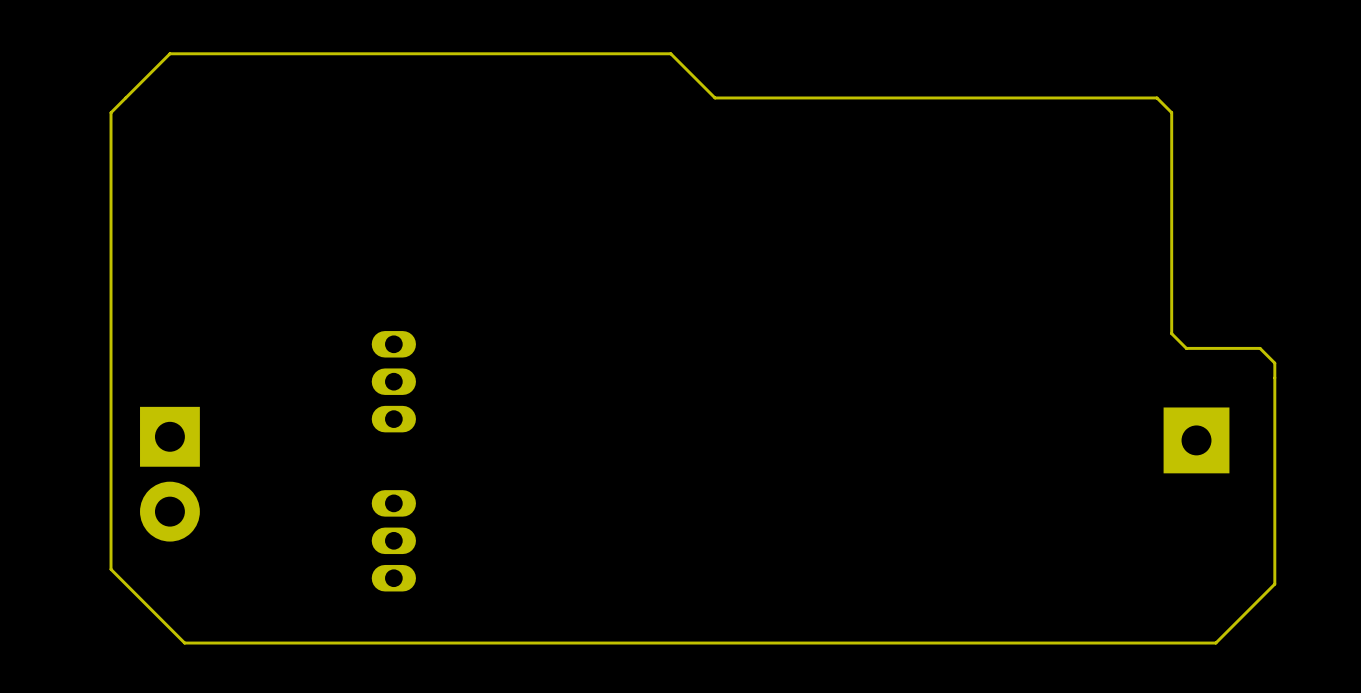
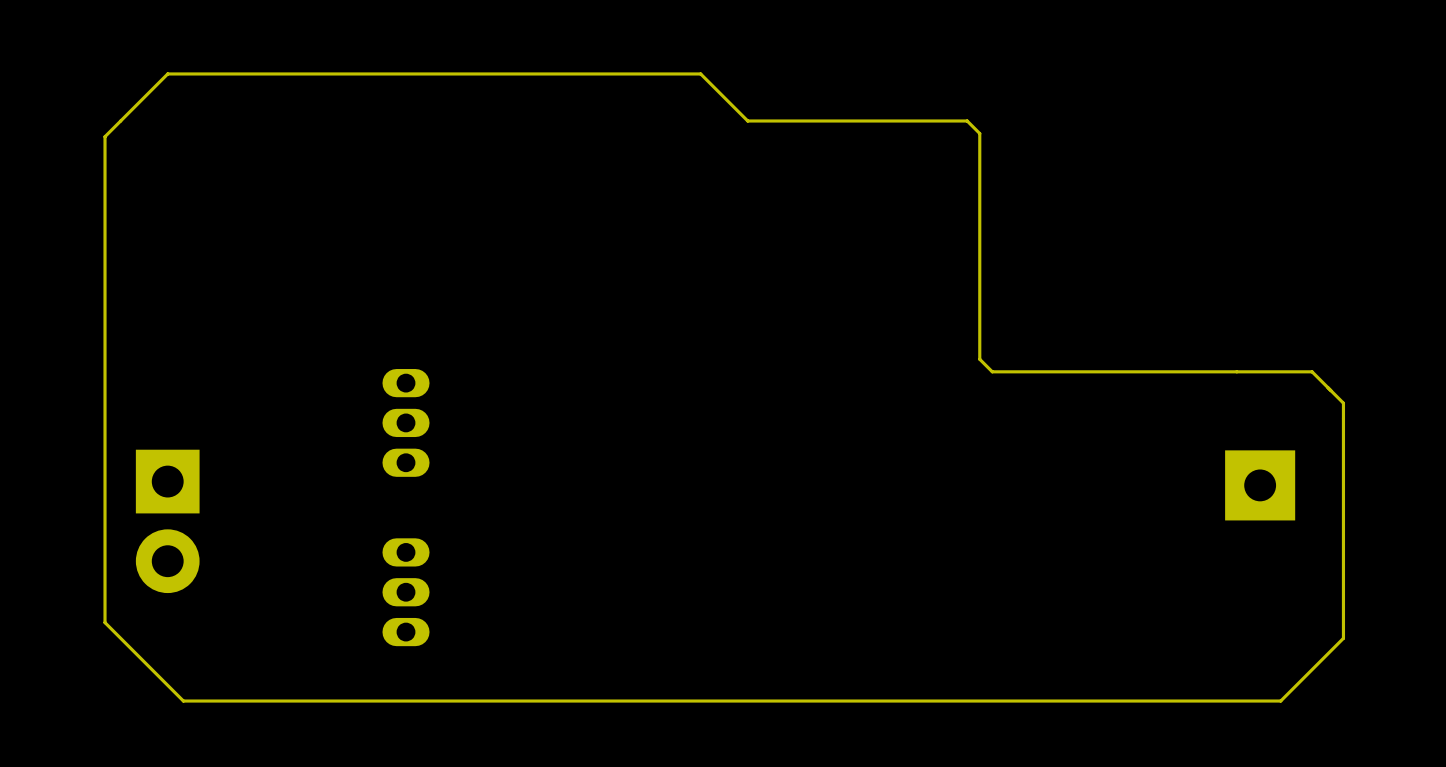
board edge: (921, 97) (1156, 97) (1171, 112) (1171, 333) (1186, 348) (1260, 348) -> (967, 121) (979, 133) (979, 359) (992, 371) (1312, 371) (1327, 387)

